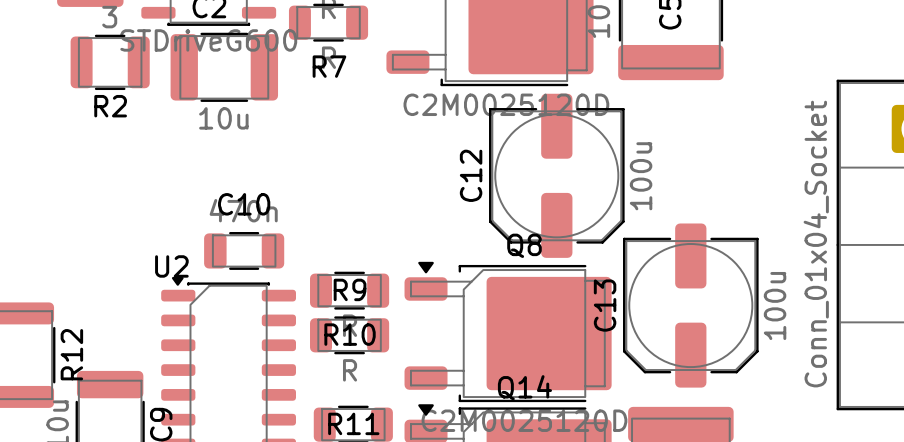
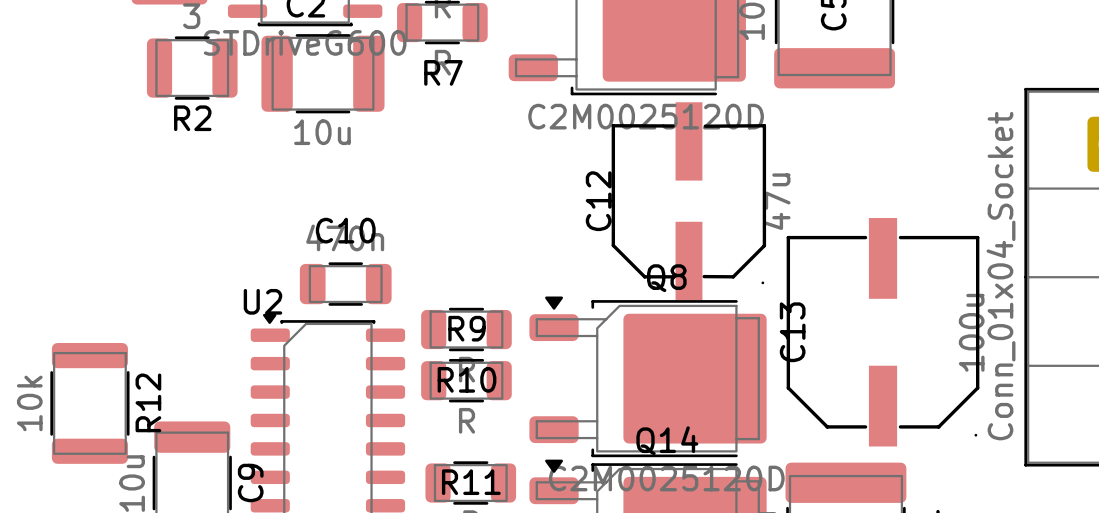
C12 footprint: [489, 93, 625, 258] -> [611, 102, 767, 301]
C12 value: 100u (641, 176) -> 47u (777, 201)
C13 footprint: [623, 223, 759, 388] -> [786, 218, 980, 447]

